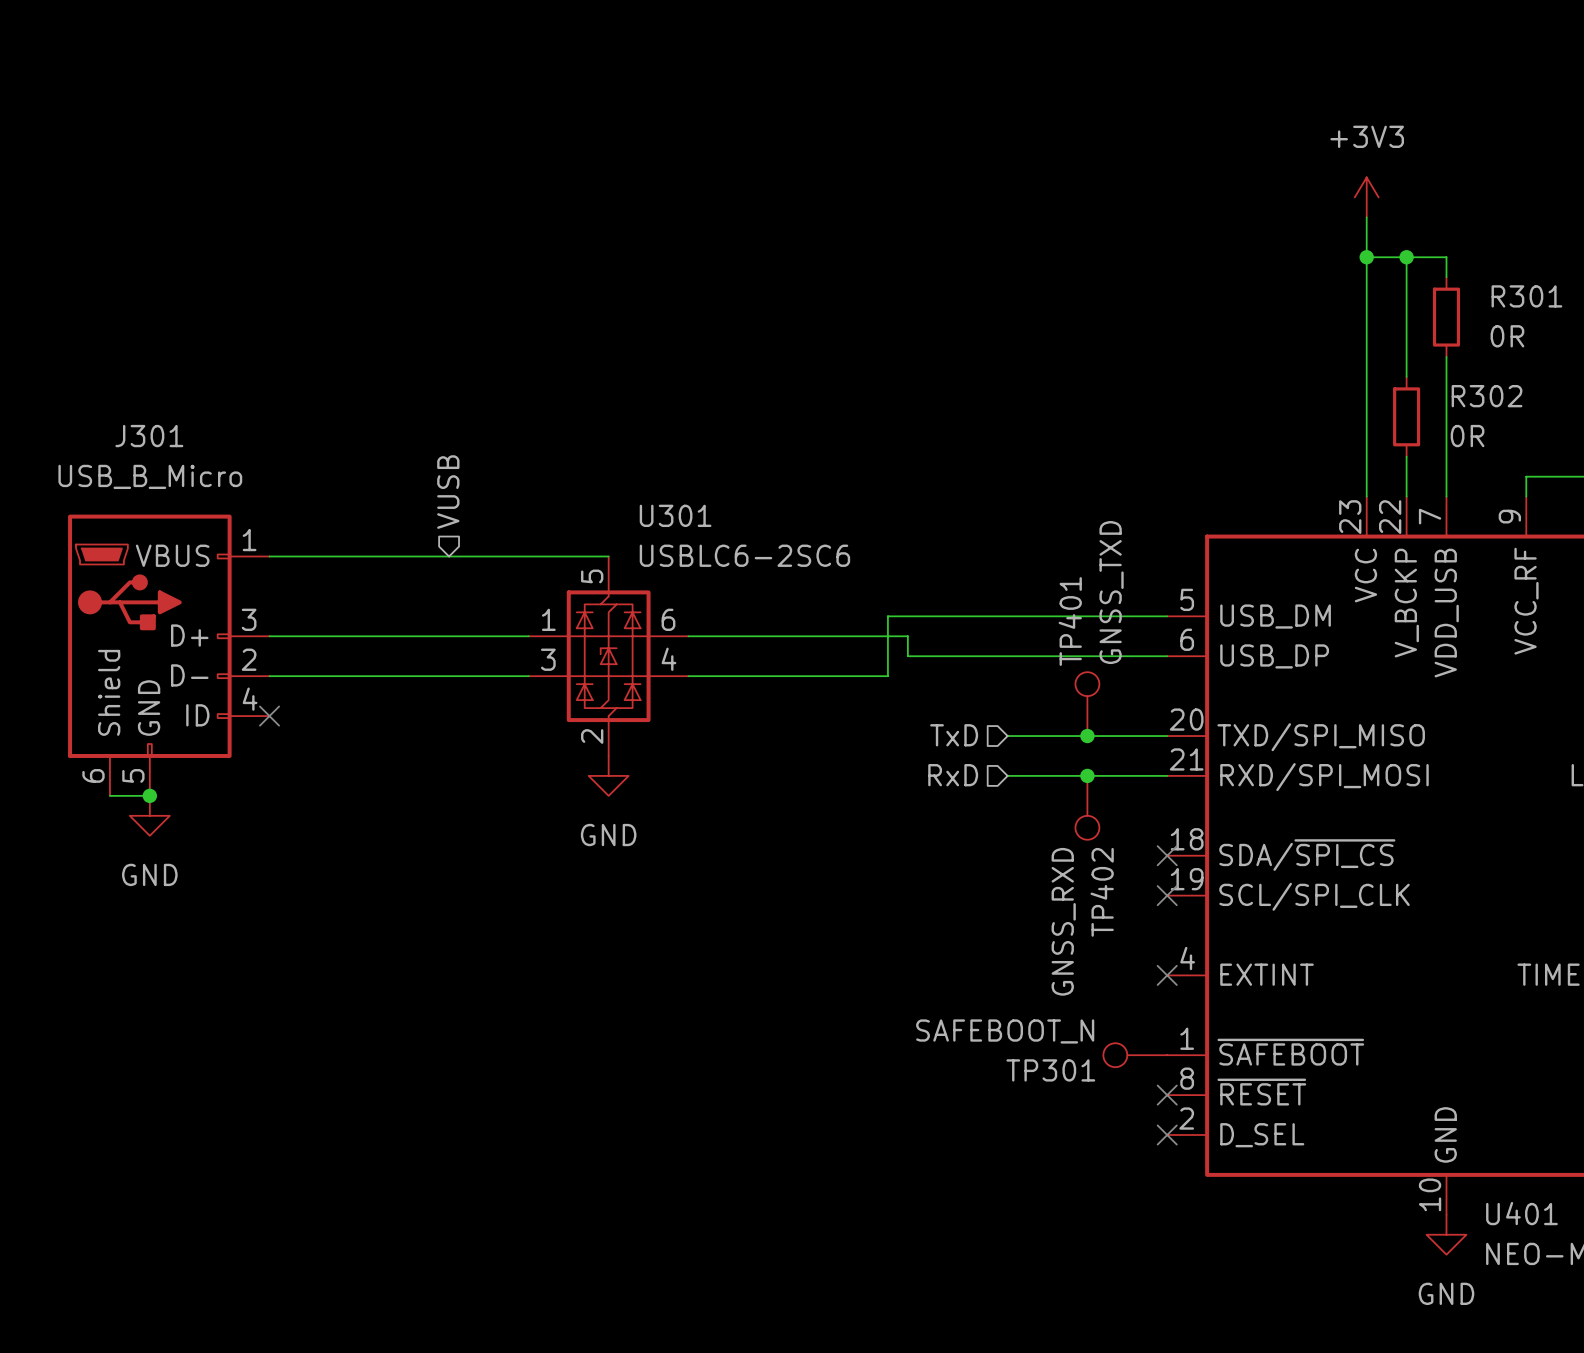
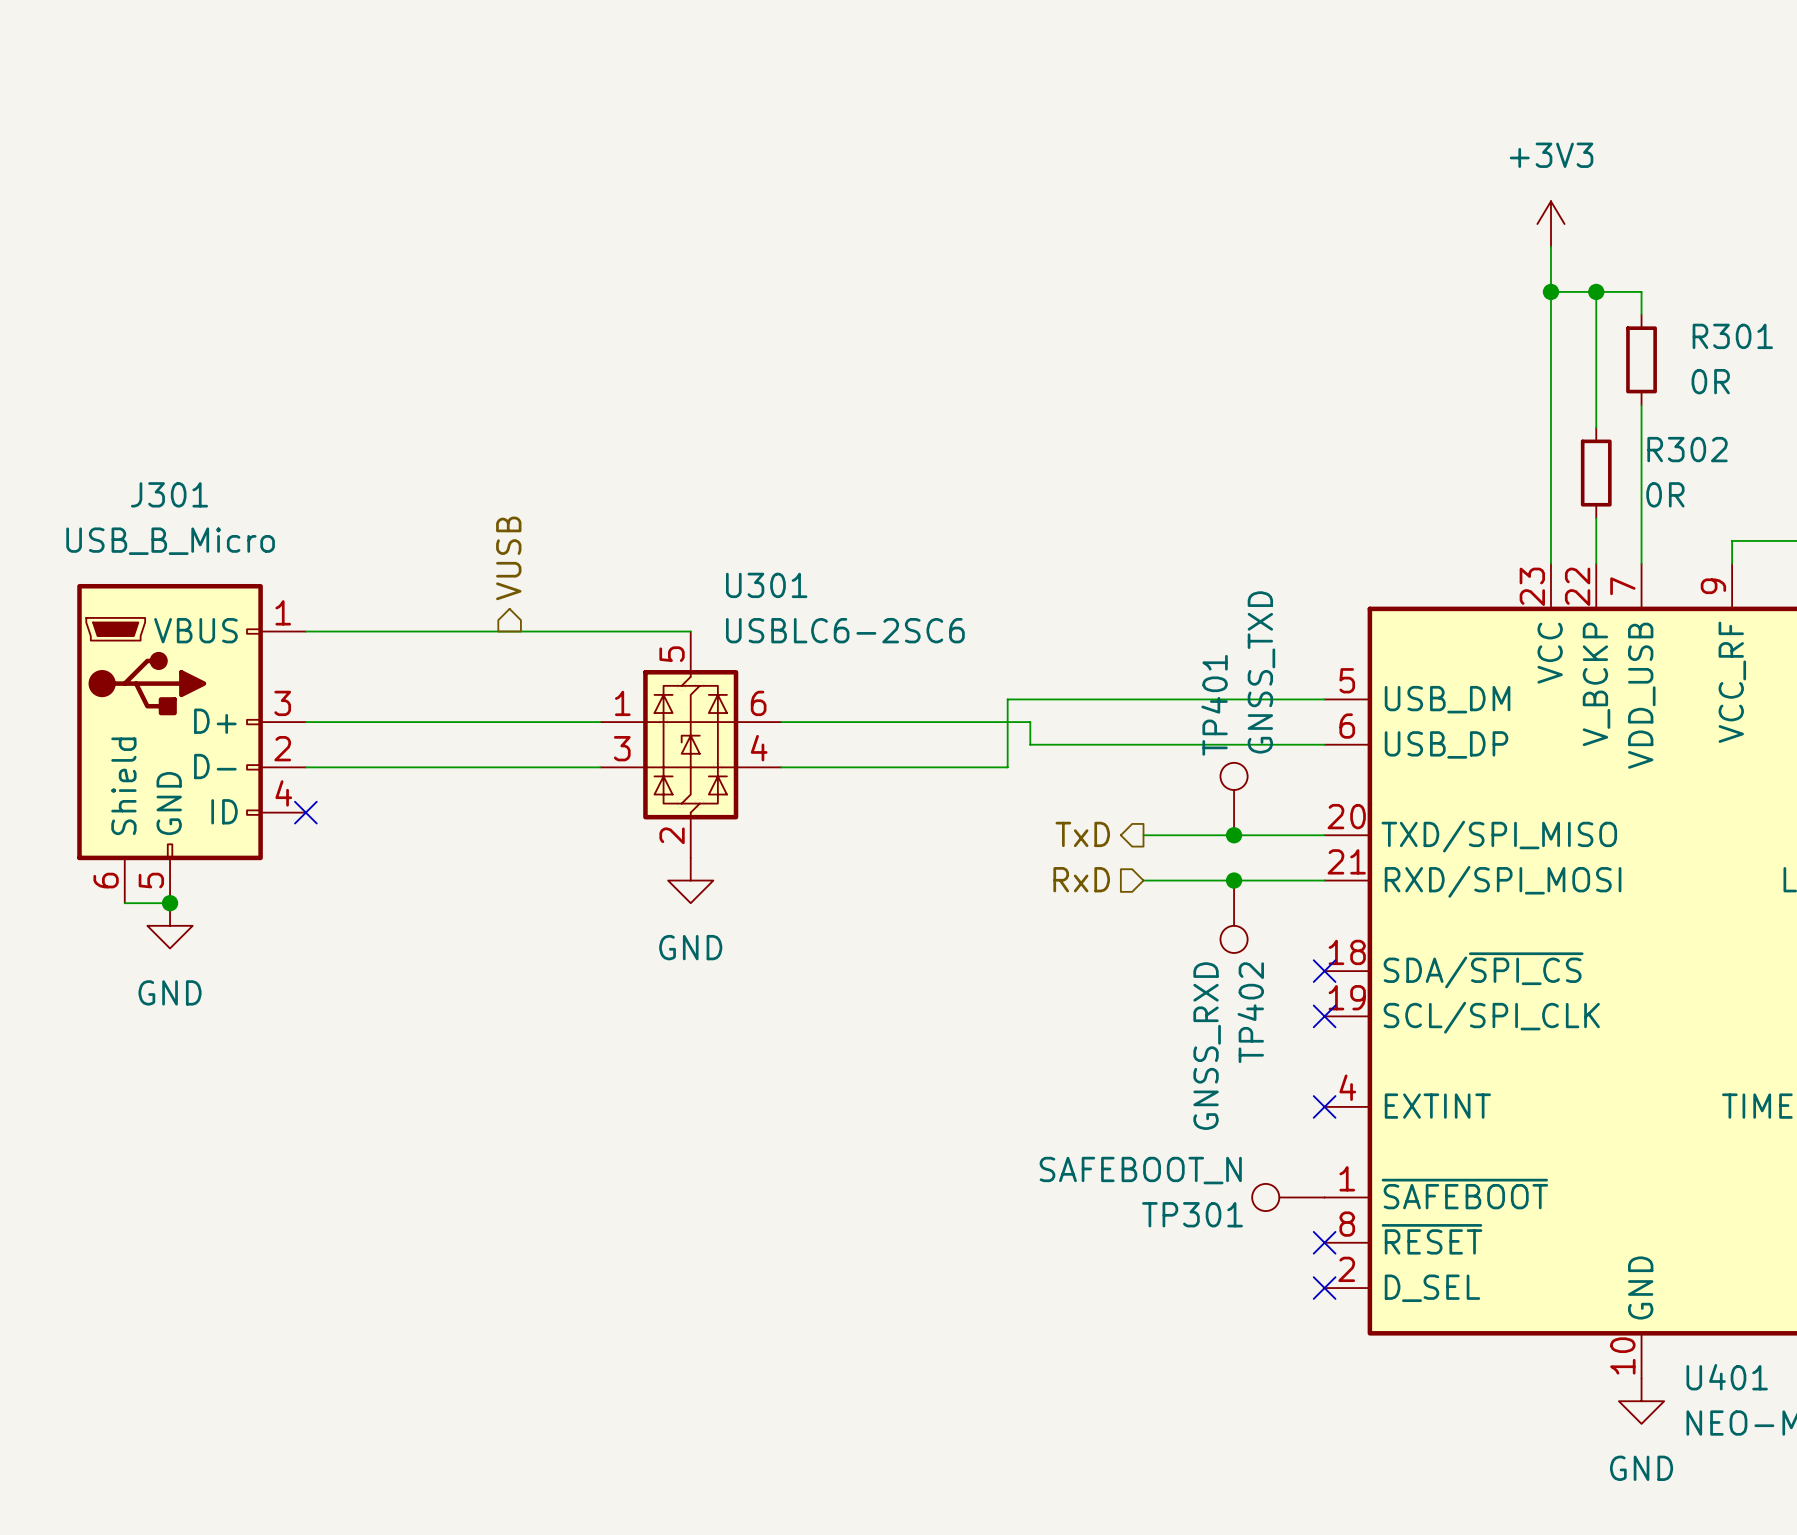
hierarchical label shape: input (448, 492) -> output (508, 558)
hierarchical label shape: input (954, 735) -> output (1082, 834)

